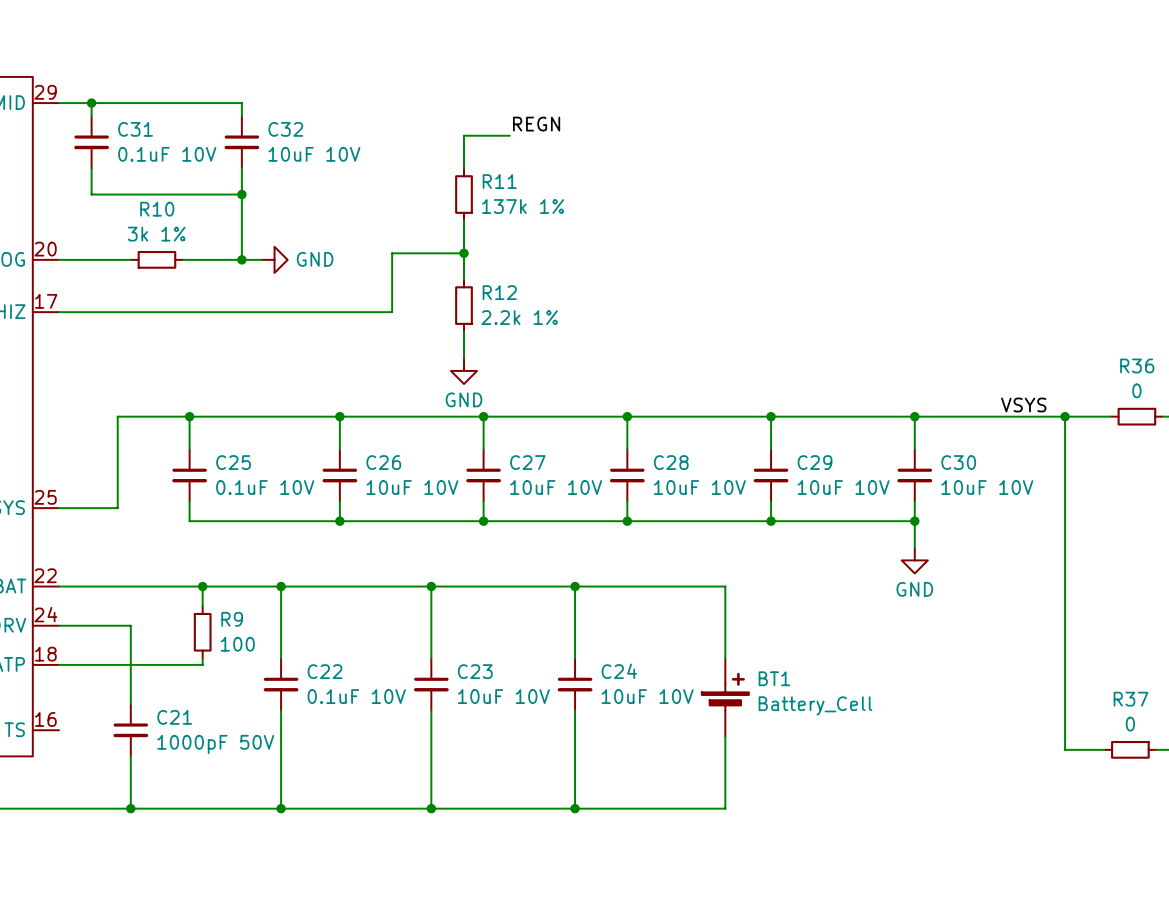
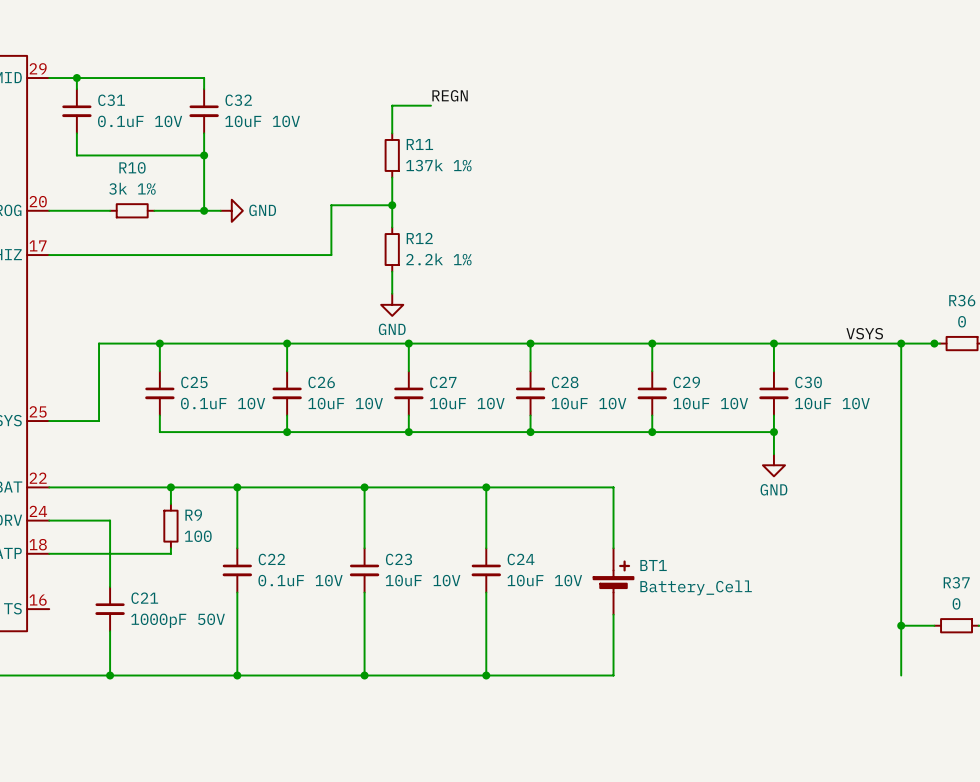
junction: none -> (934, 343)
wire: none -> (901, 625) (901, 675)
junction: none -> (901, 625)

